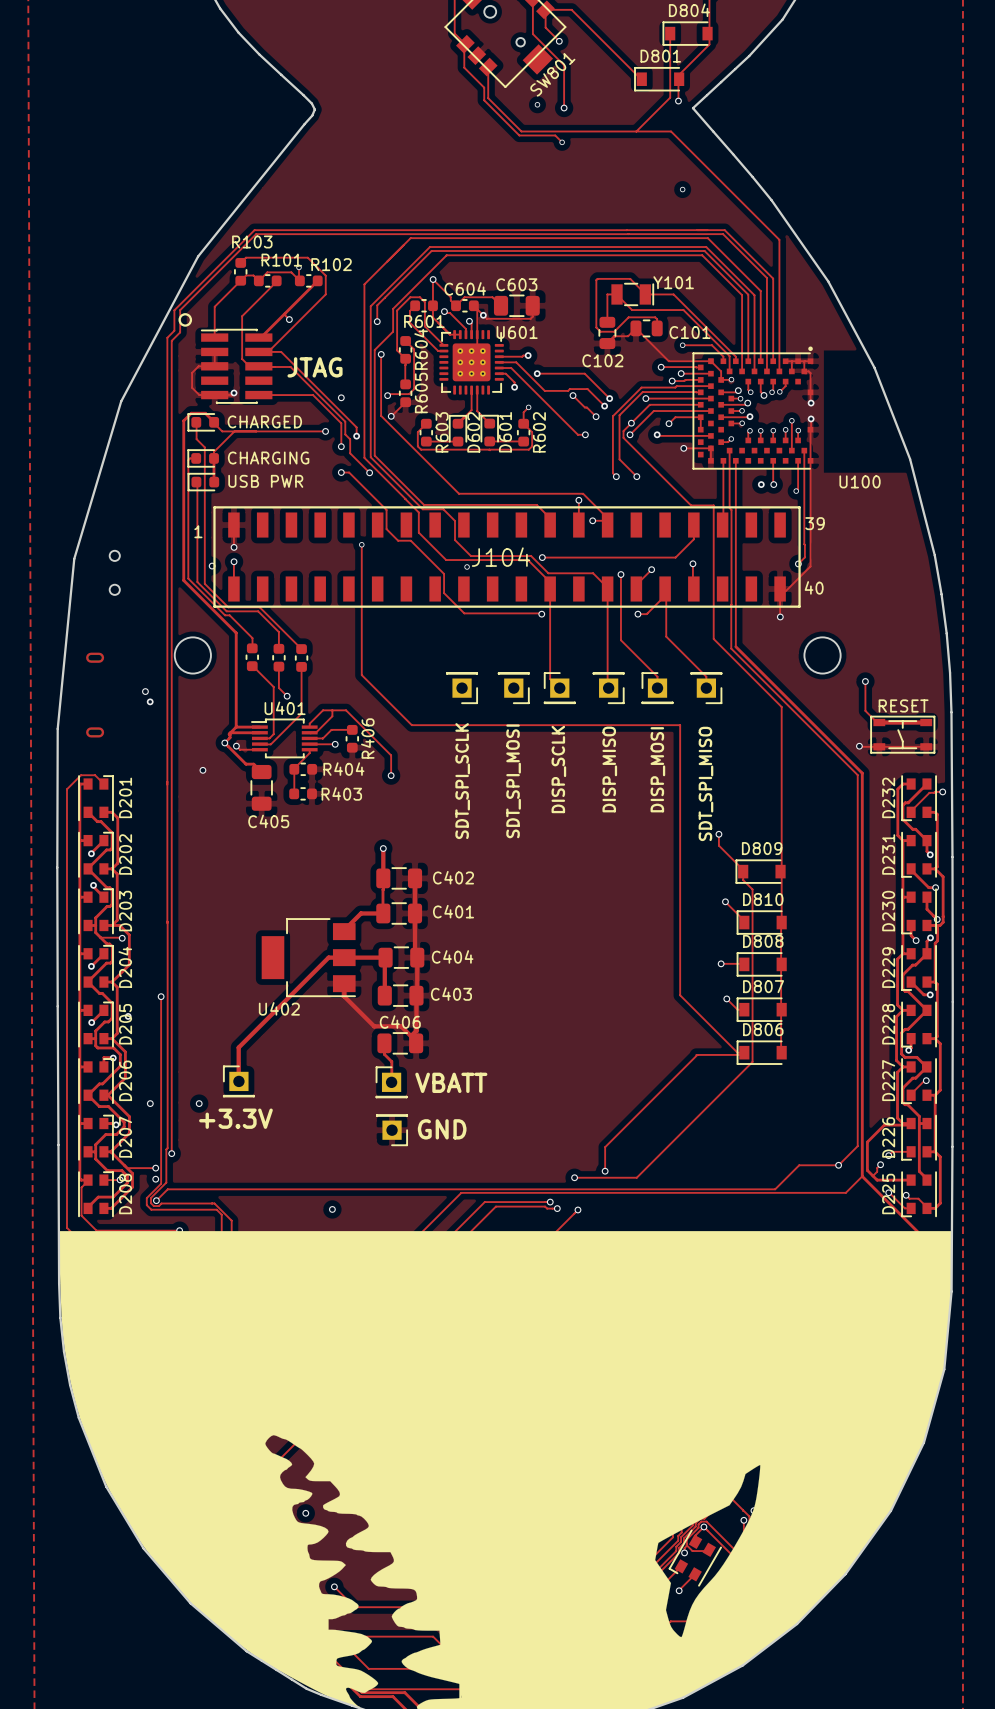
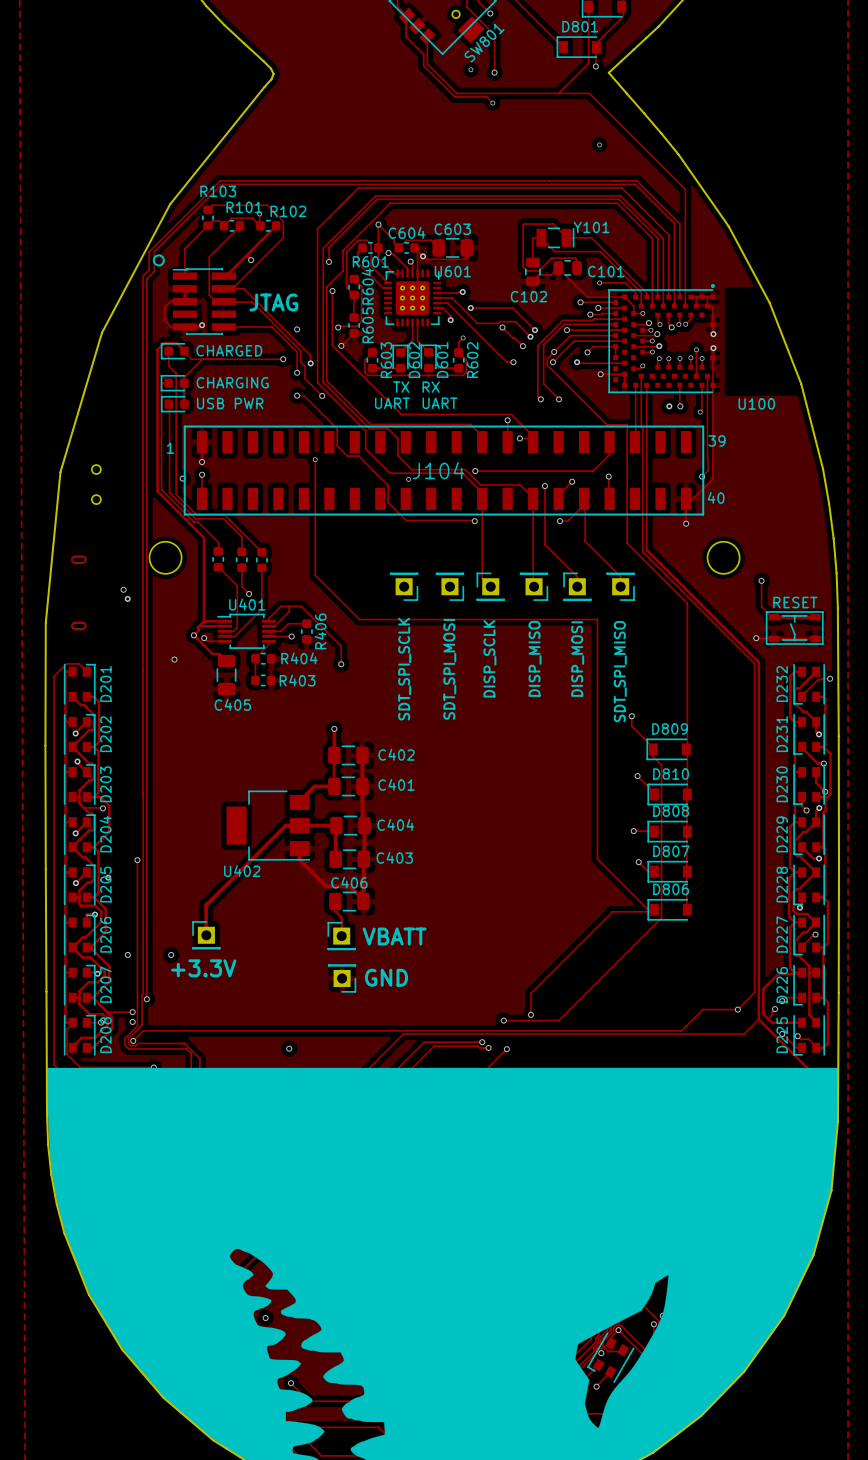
text: none -> TX (401, 387)
text: none -> RX (431, 387)
text: none -> UART (392, 403)
text: none -> UART (439, 403)

